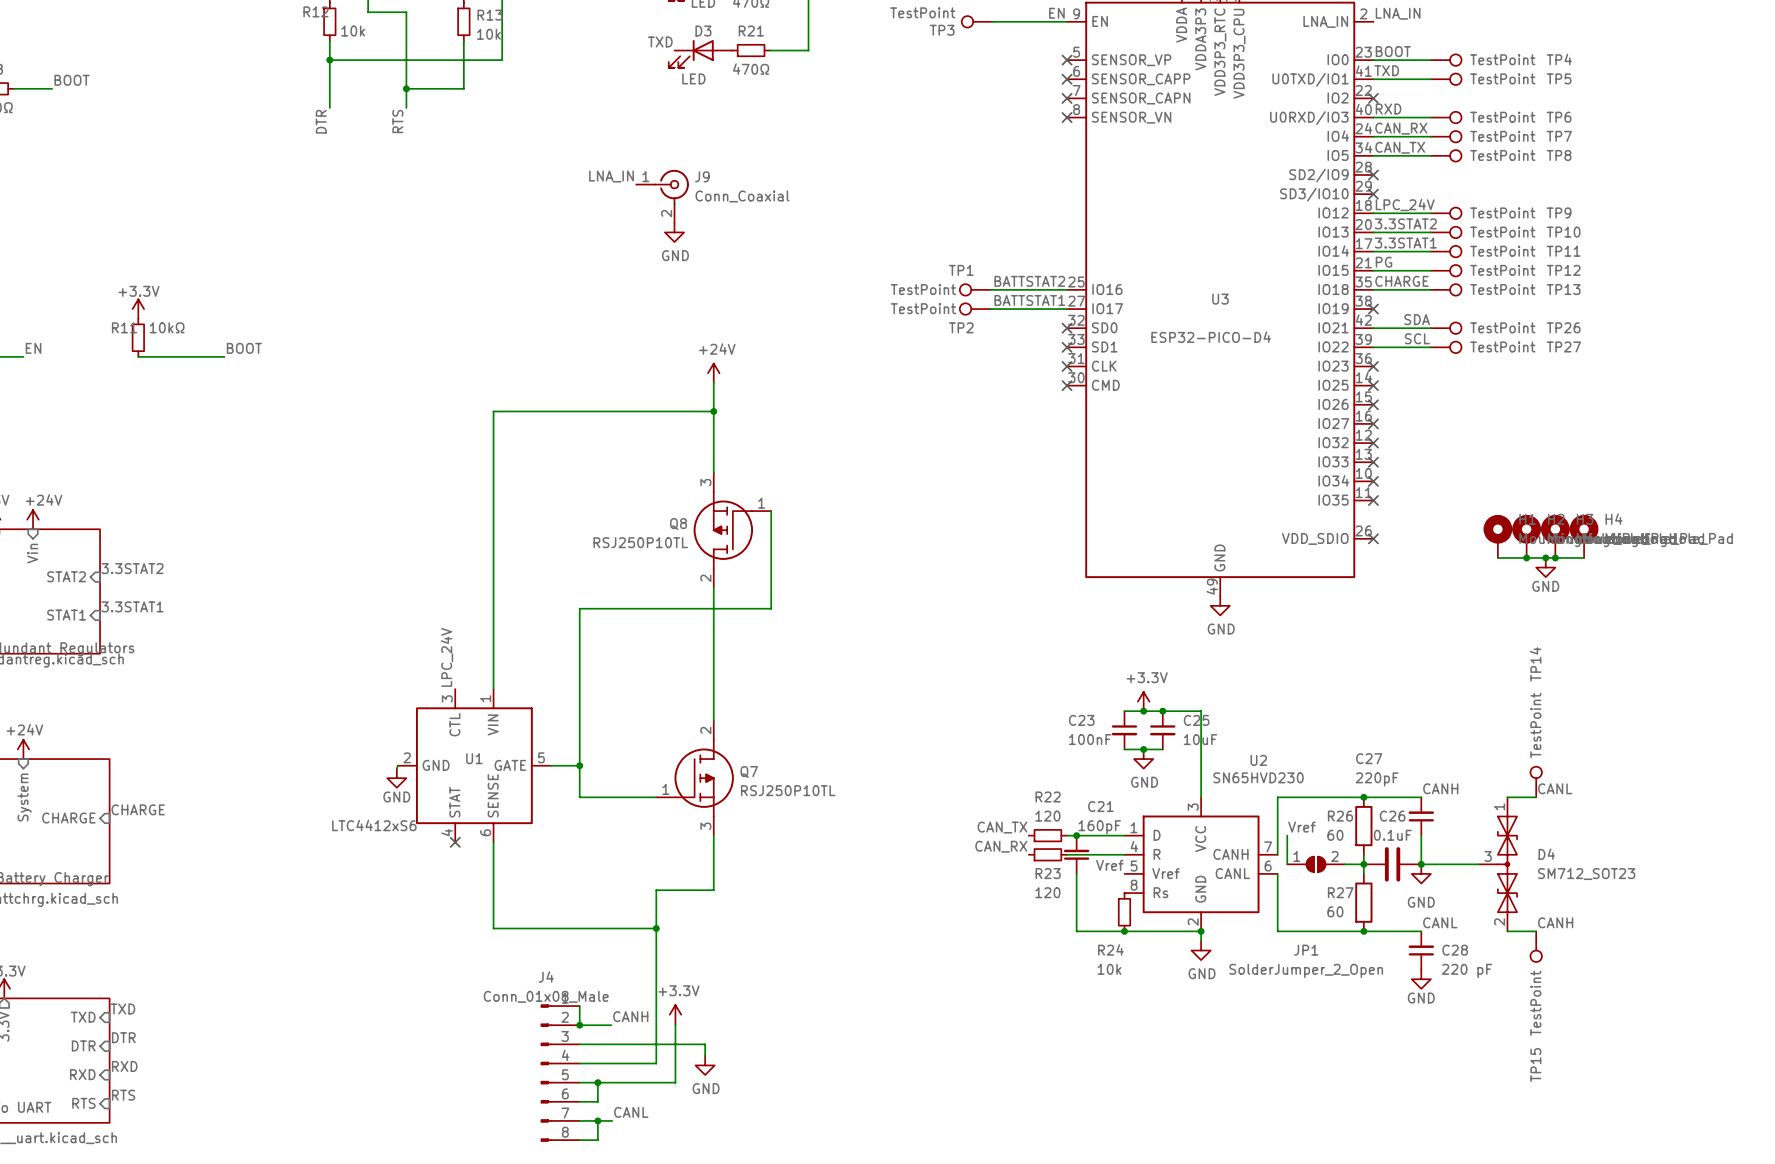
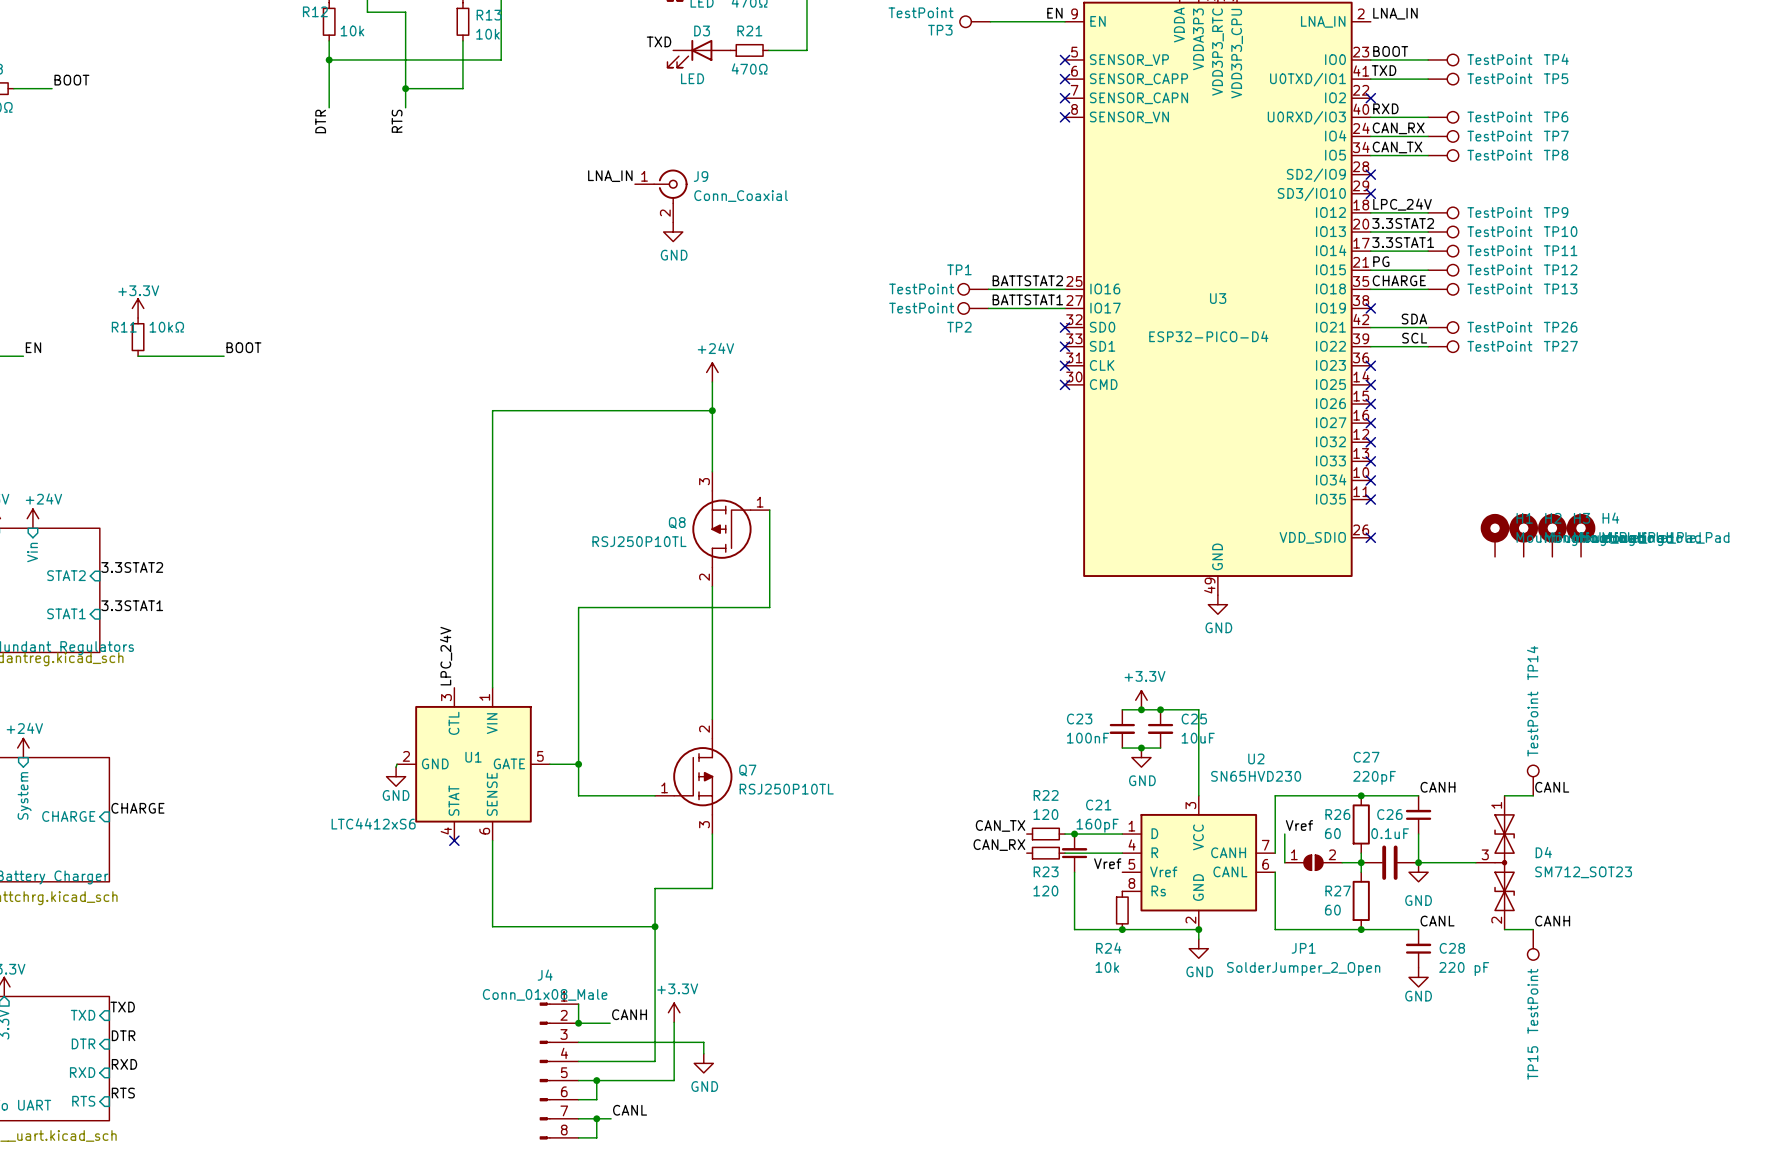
wire: (1497, 557) (1584, 557) -> none
junction: (1526, 557) -> none
junction: (1545, 557) -> none
junction: (1555, 557) -> none
power symbol: GND (1545, 567) -> none

